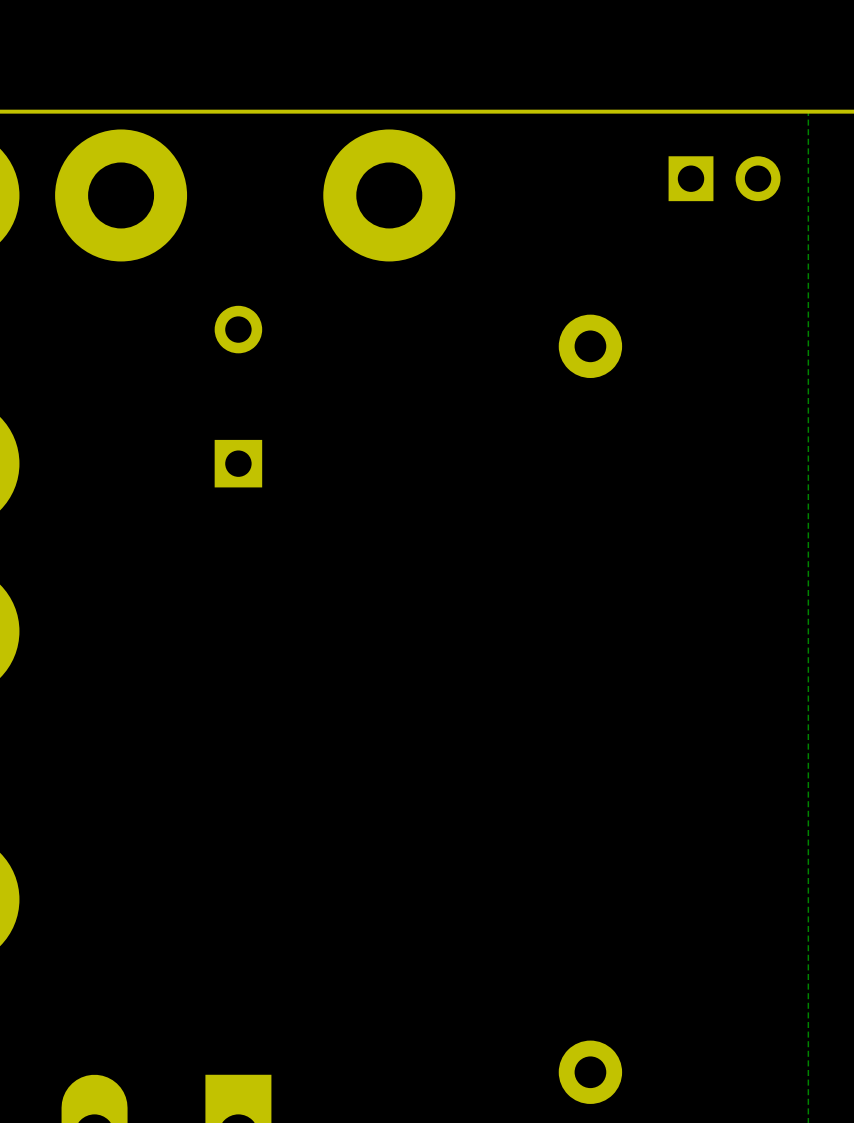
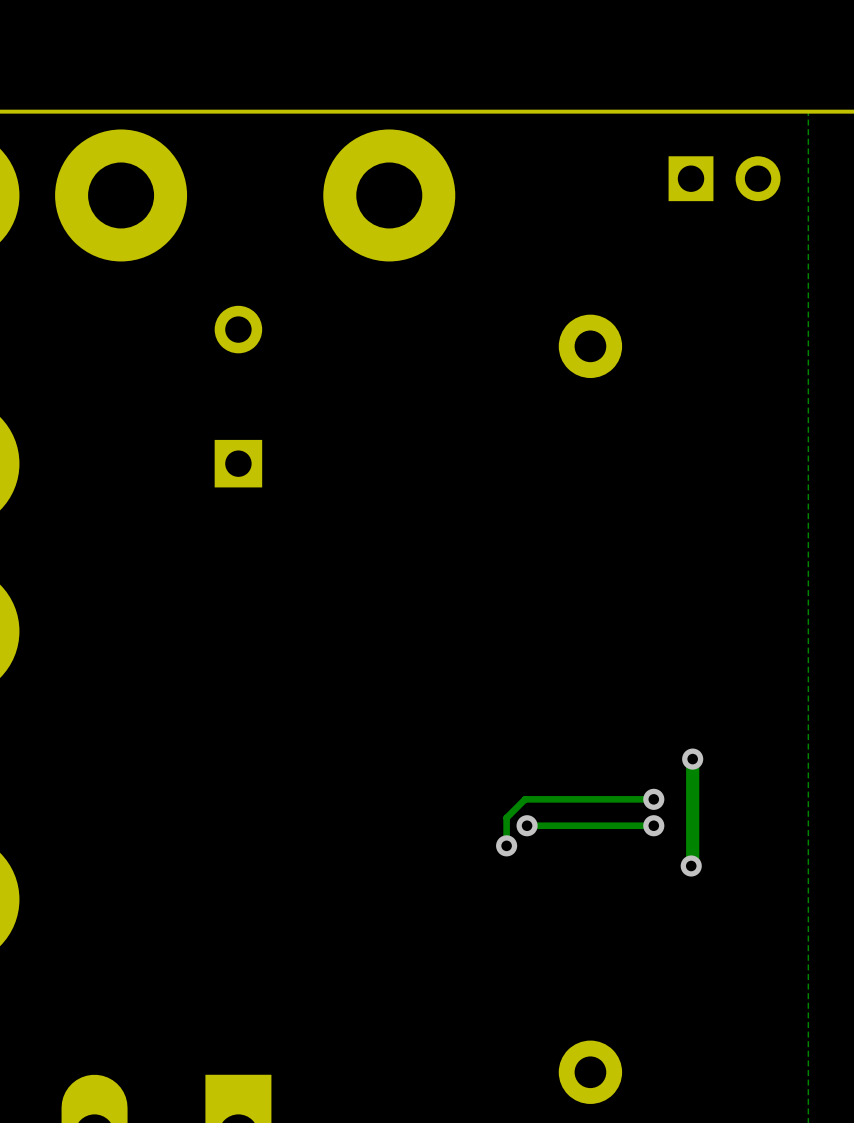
track: none -> (692, 759) (691, 865)
via: none -> (692, 759)
track: none -> (653, 799) (525, 799) (506, 817) (506, 845)
via: none -> (653, 799)
via: none -> (527, 825)
track: none -> (653, 825) (527, 825)
via: none -> (653, 825)
via: none -> (506, 845)
via: none -> (691, 865)

